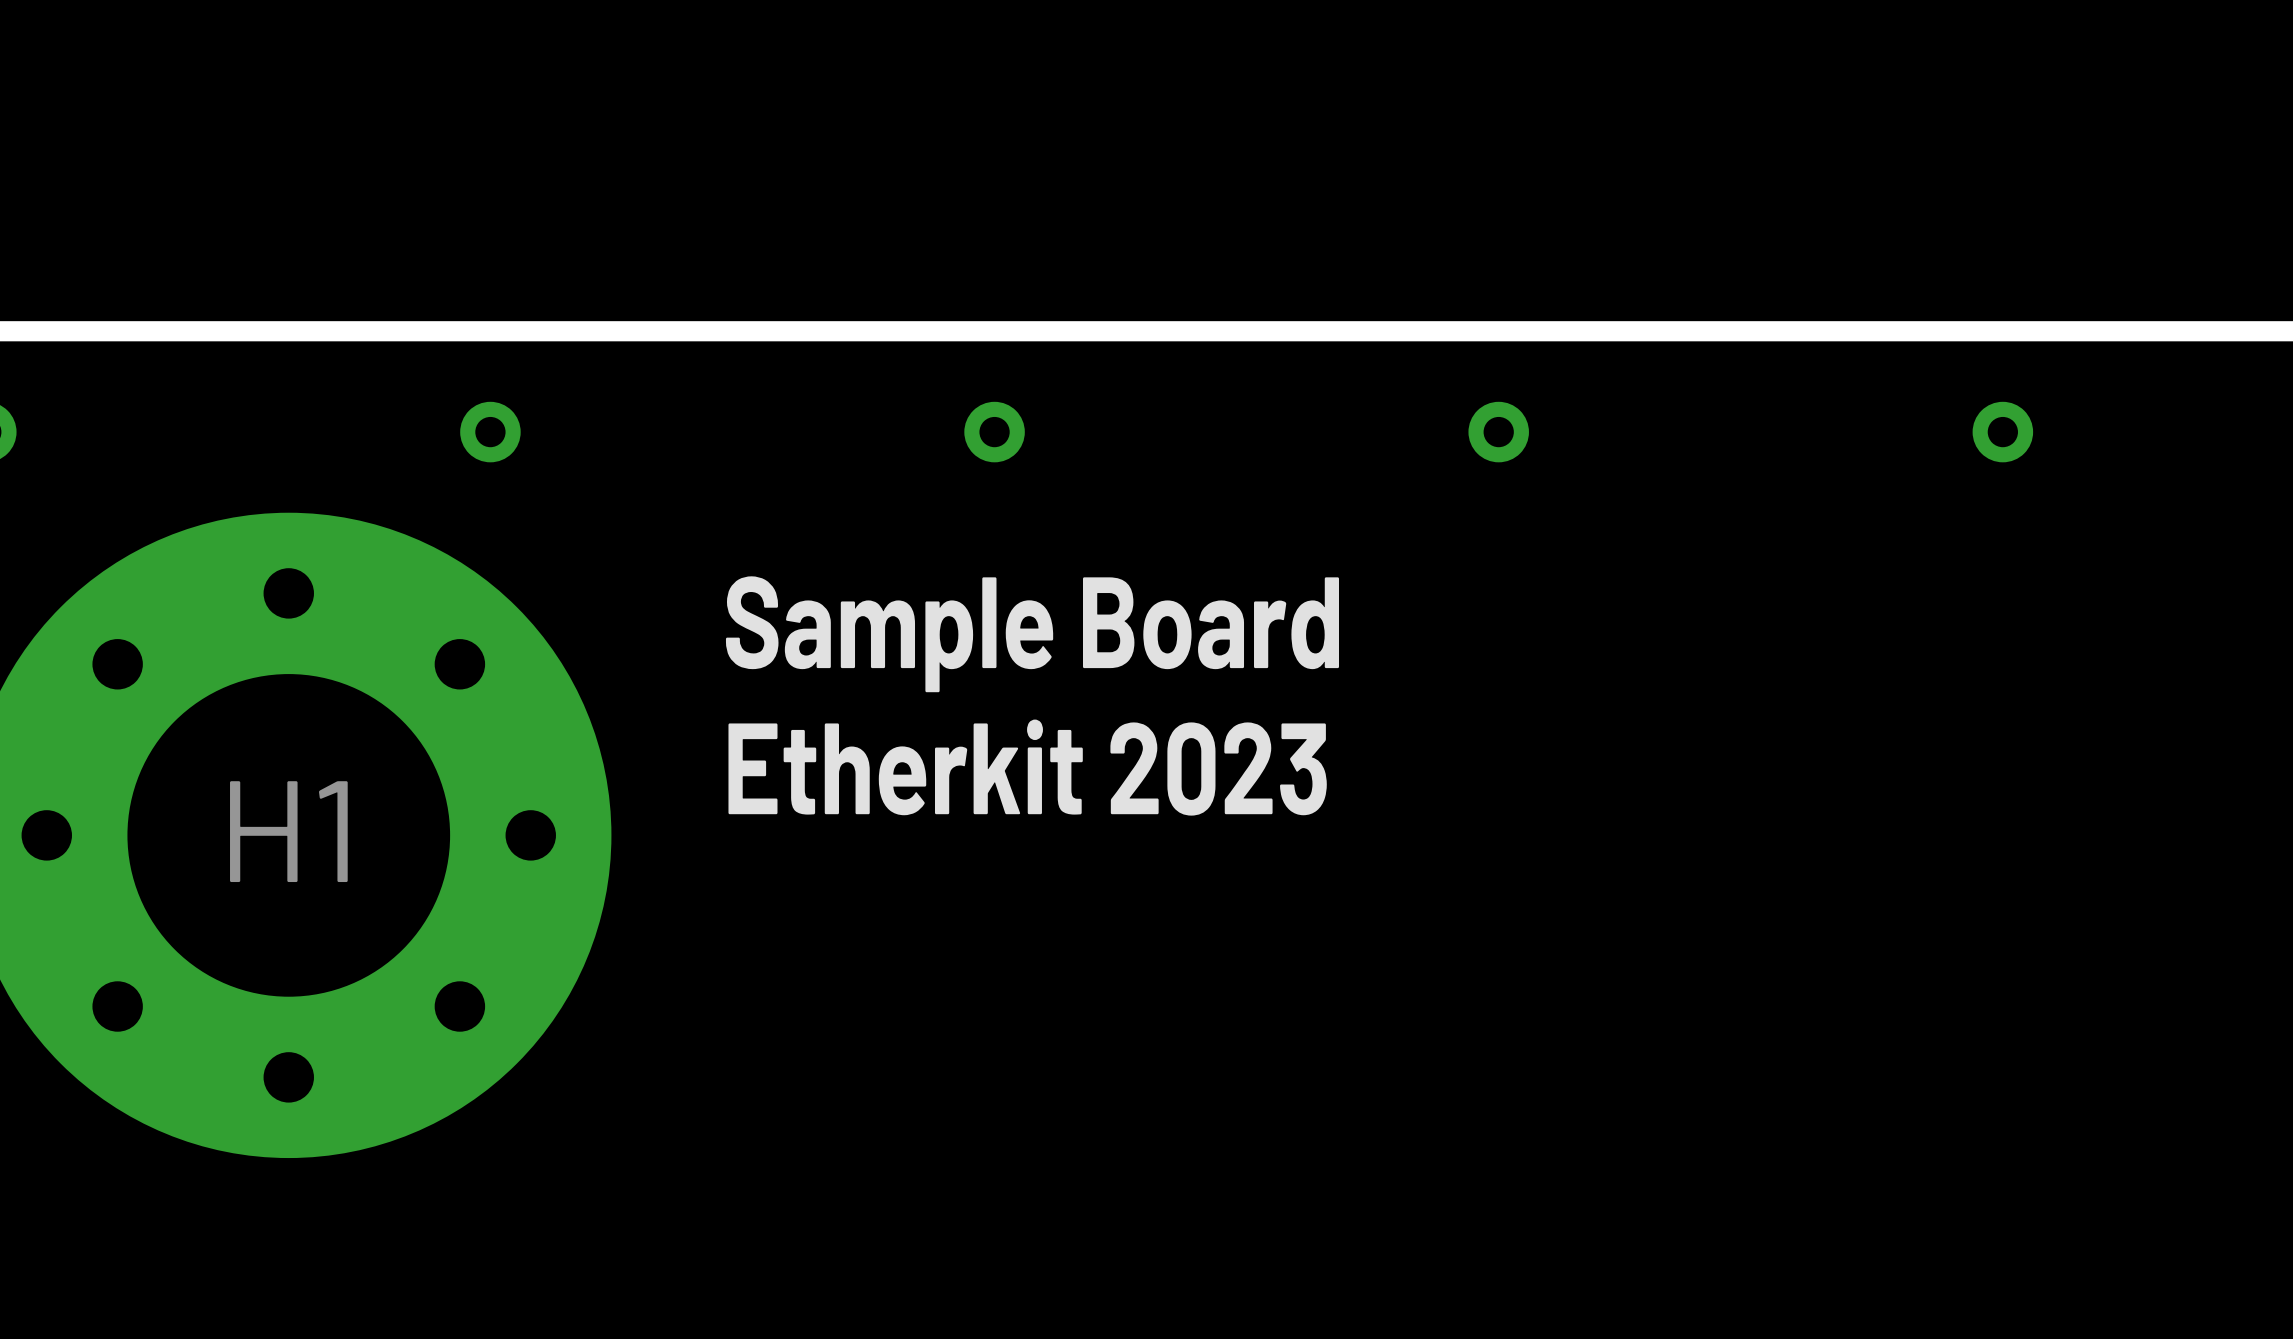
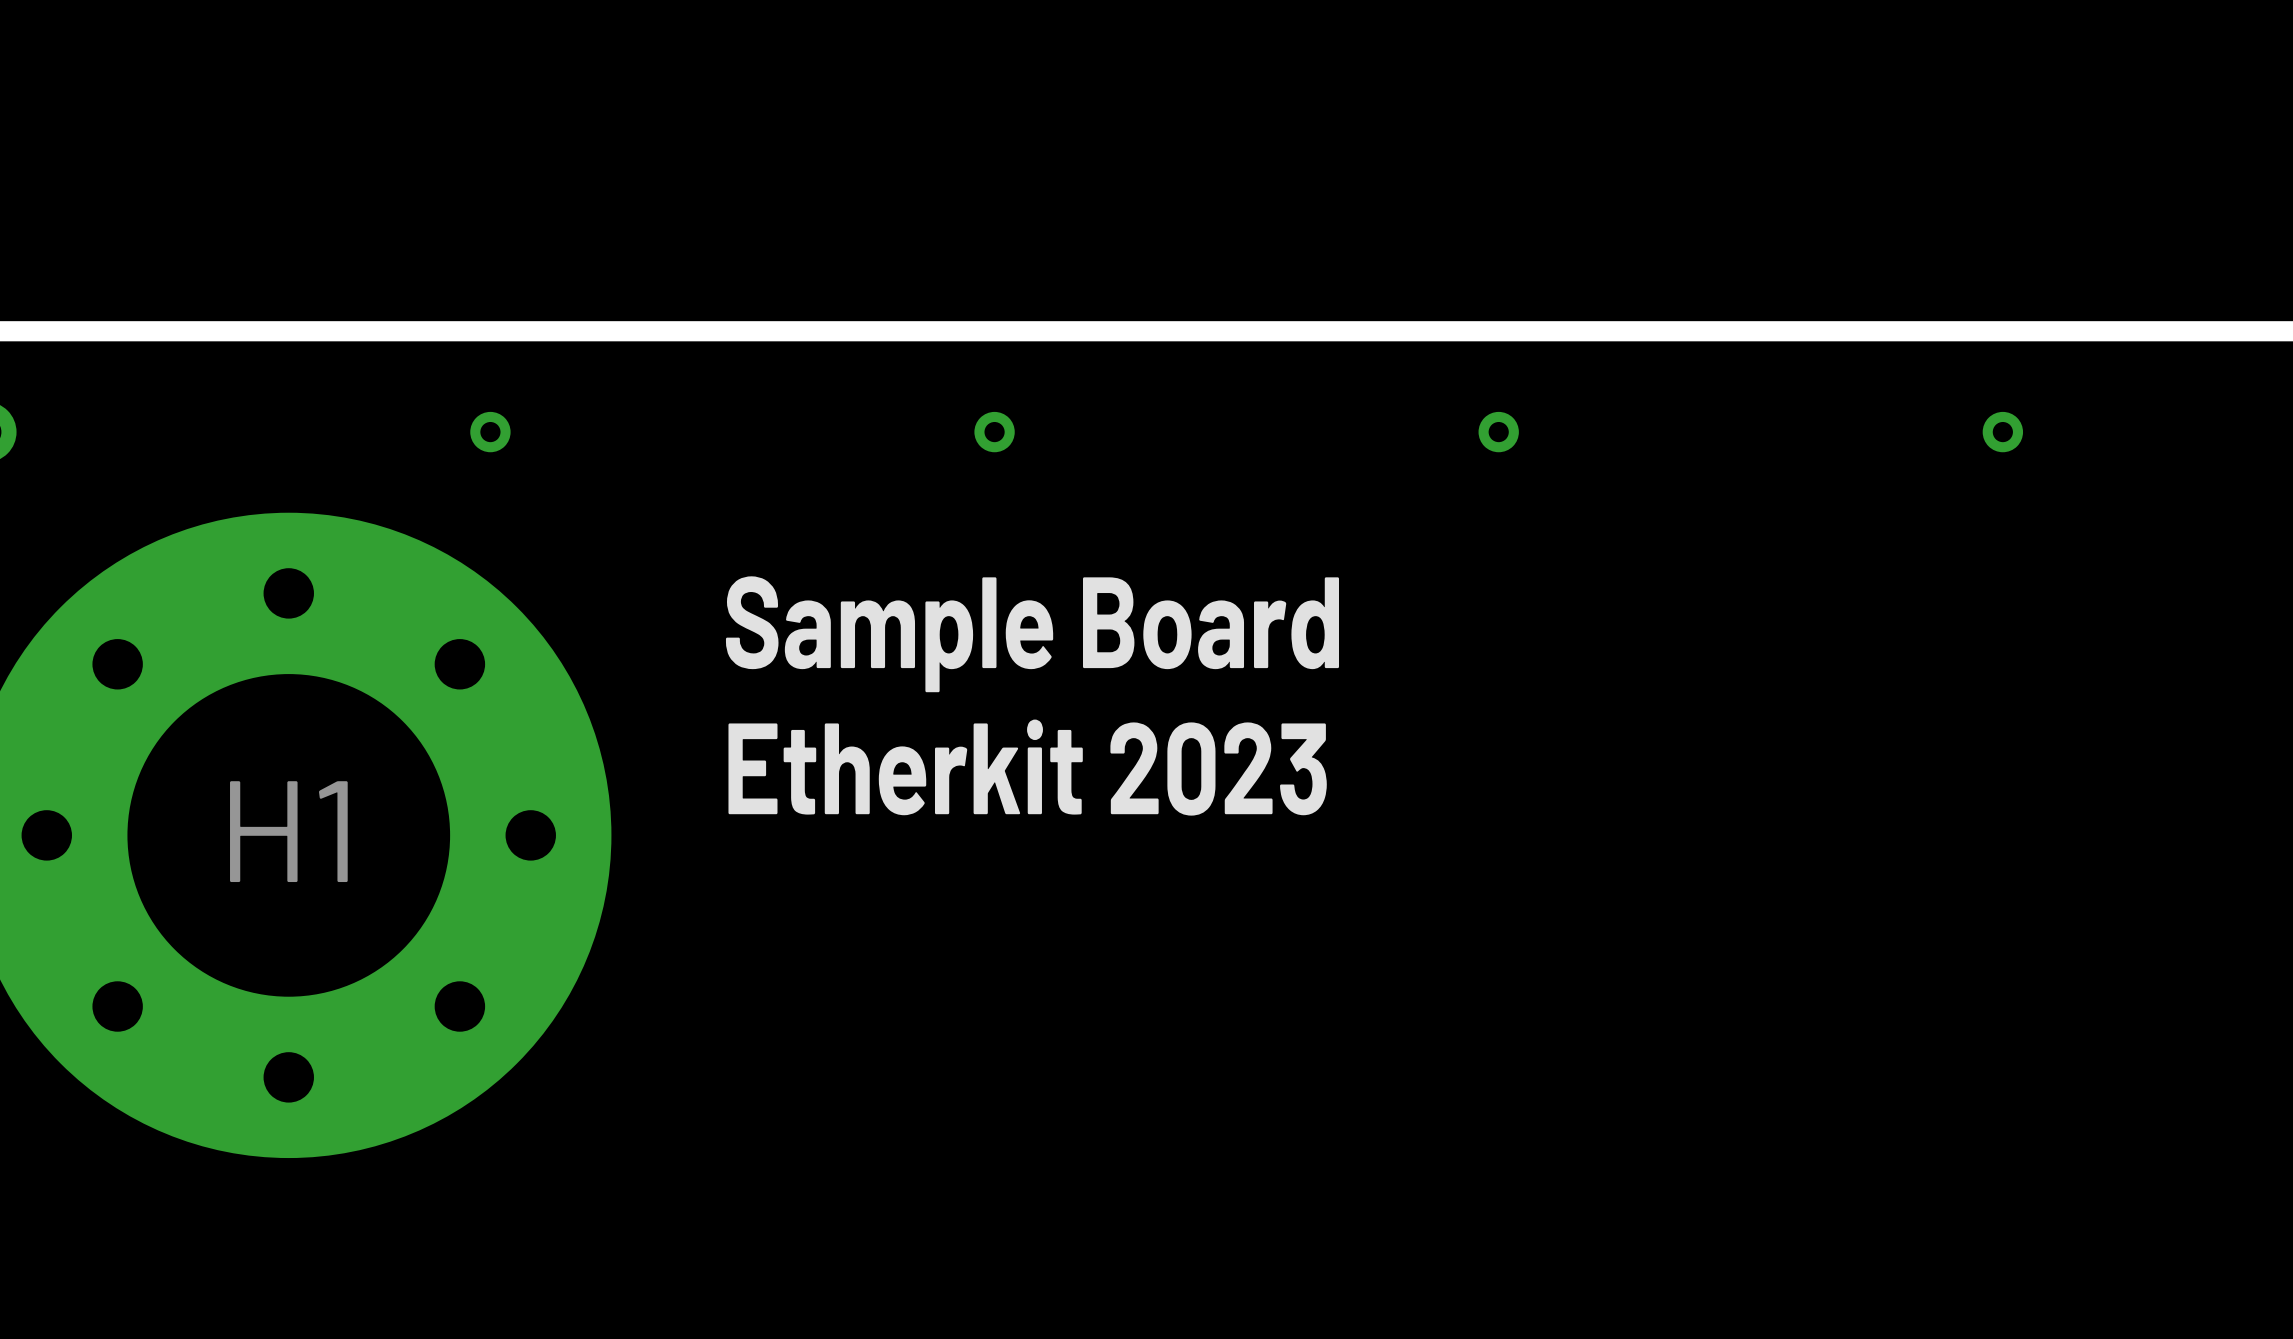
via size: [460, 401, 521, 463] -> [470, 411, 511, 453]
via size: [964, 401, 1025, 463] -> [974, 411, 1015, 453]
via size: [1468, 401, 1529, 463] -> [1478, 411, 1519, 453]
via size: [1972, 401, 2034, 463] -> [1982, 411, 2024, 453]

